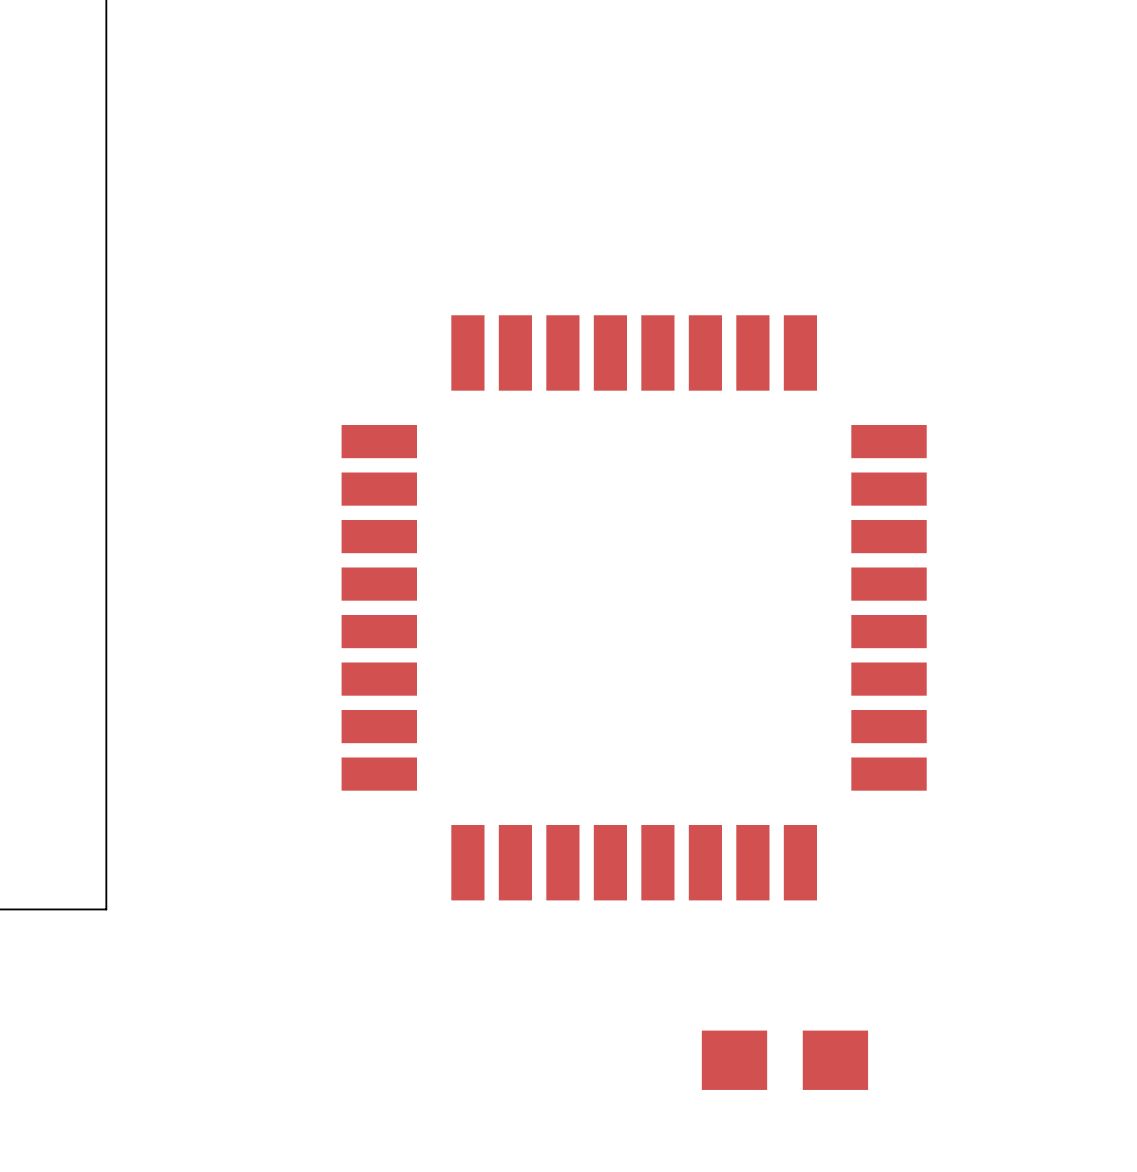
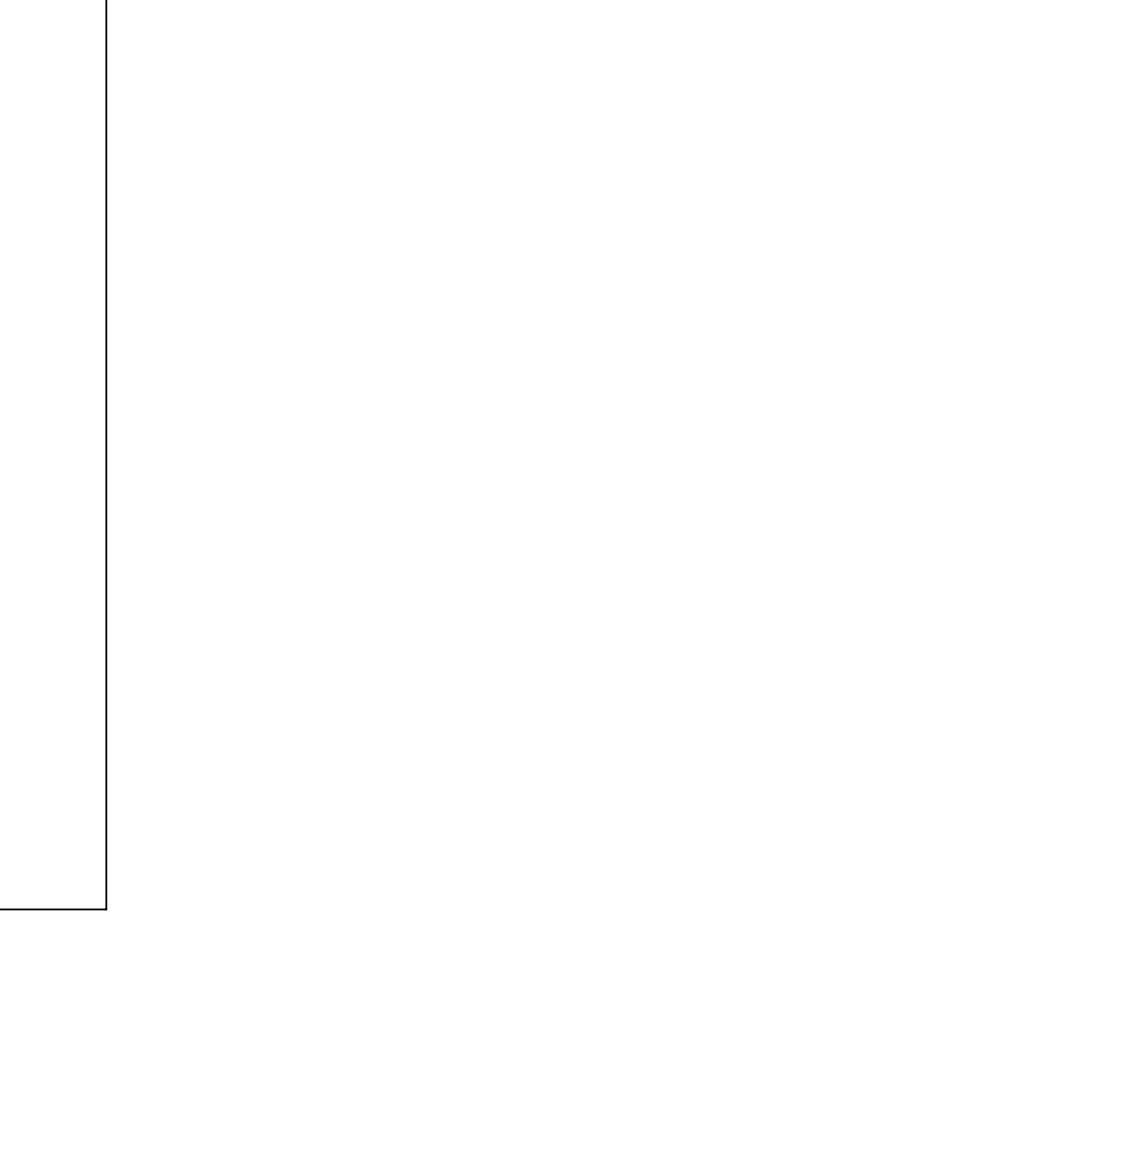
part: (634, 607) -> none
part: (784, 1060) -> none

